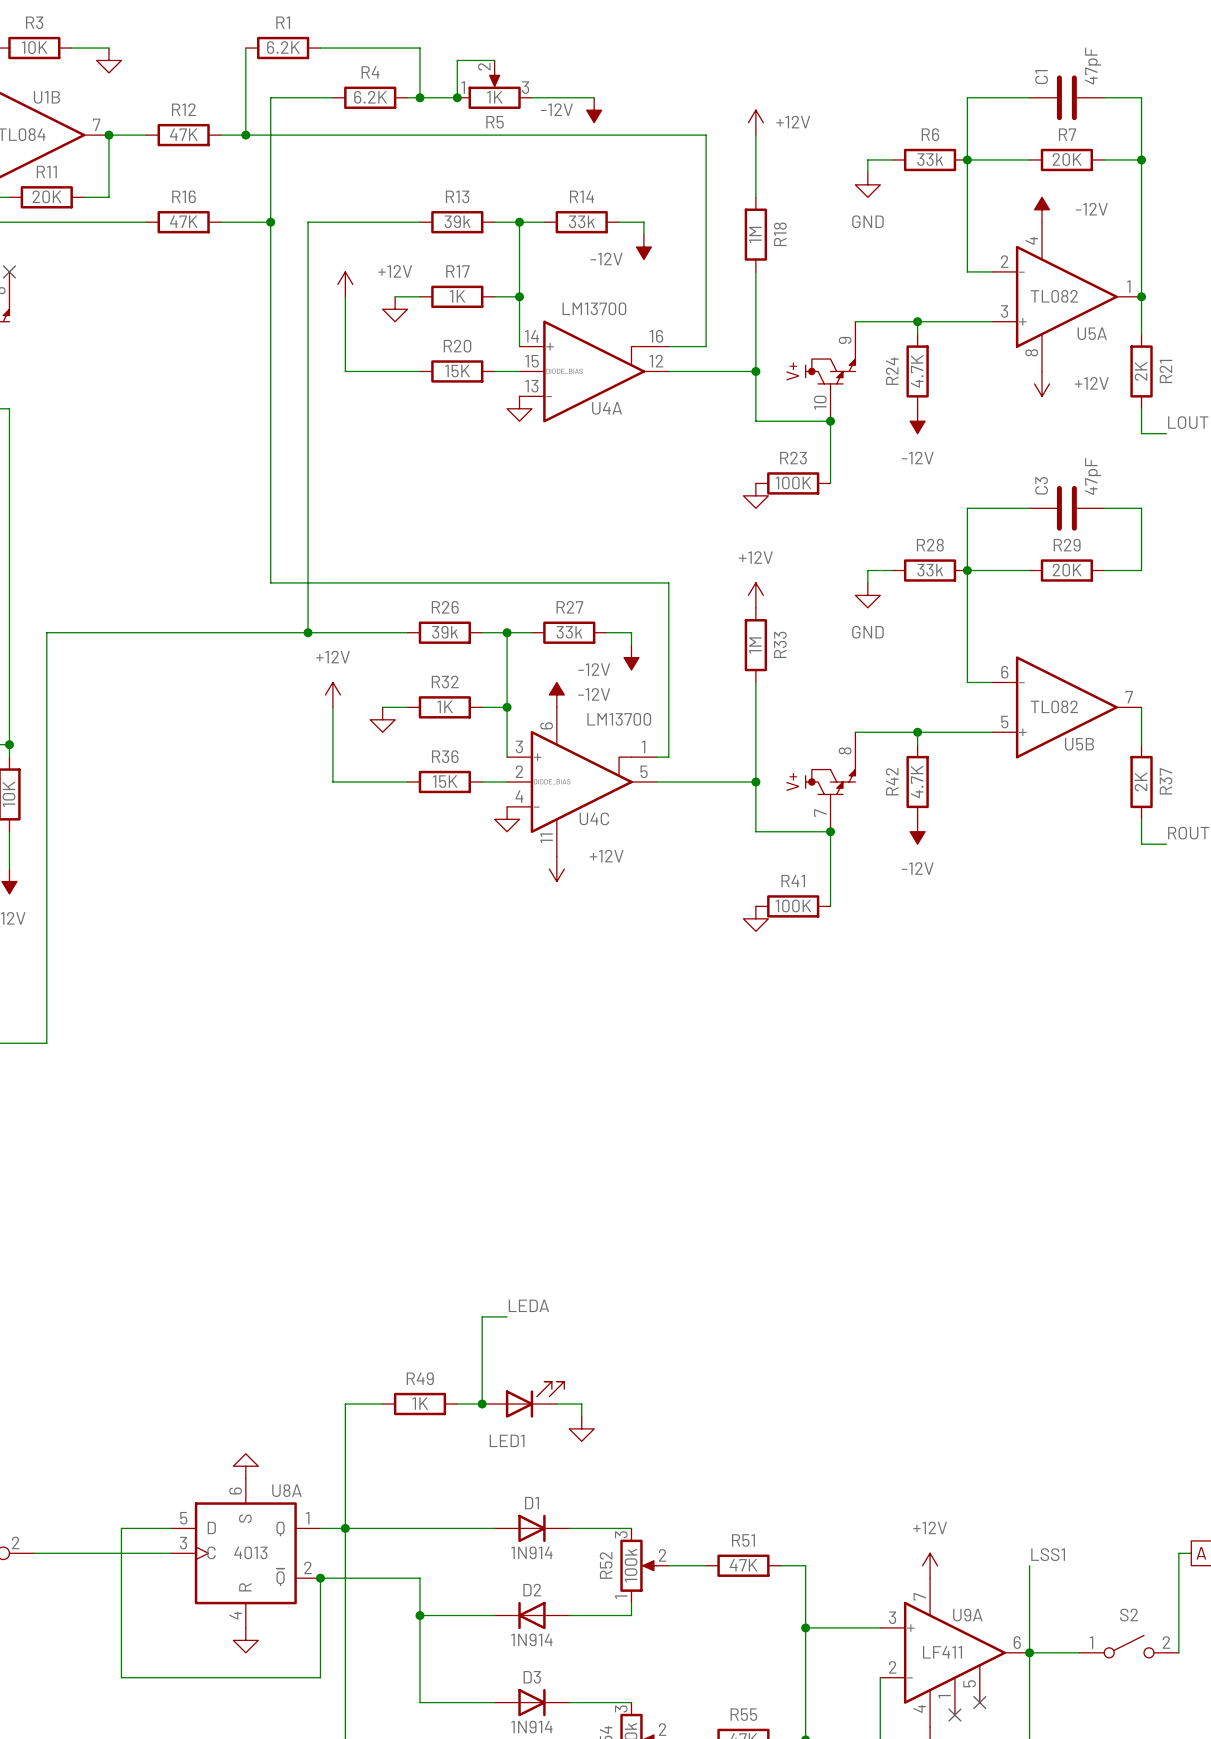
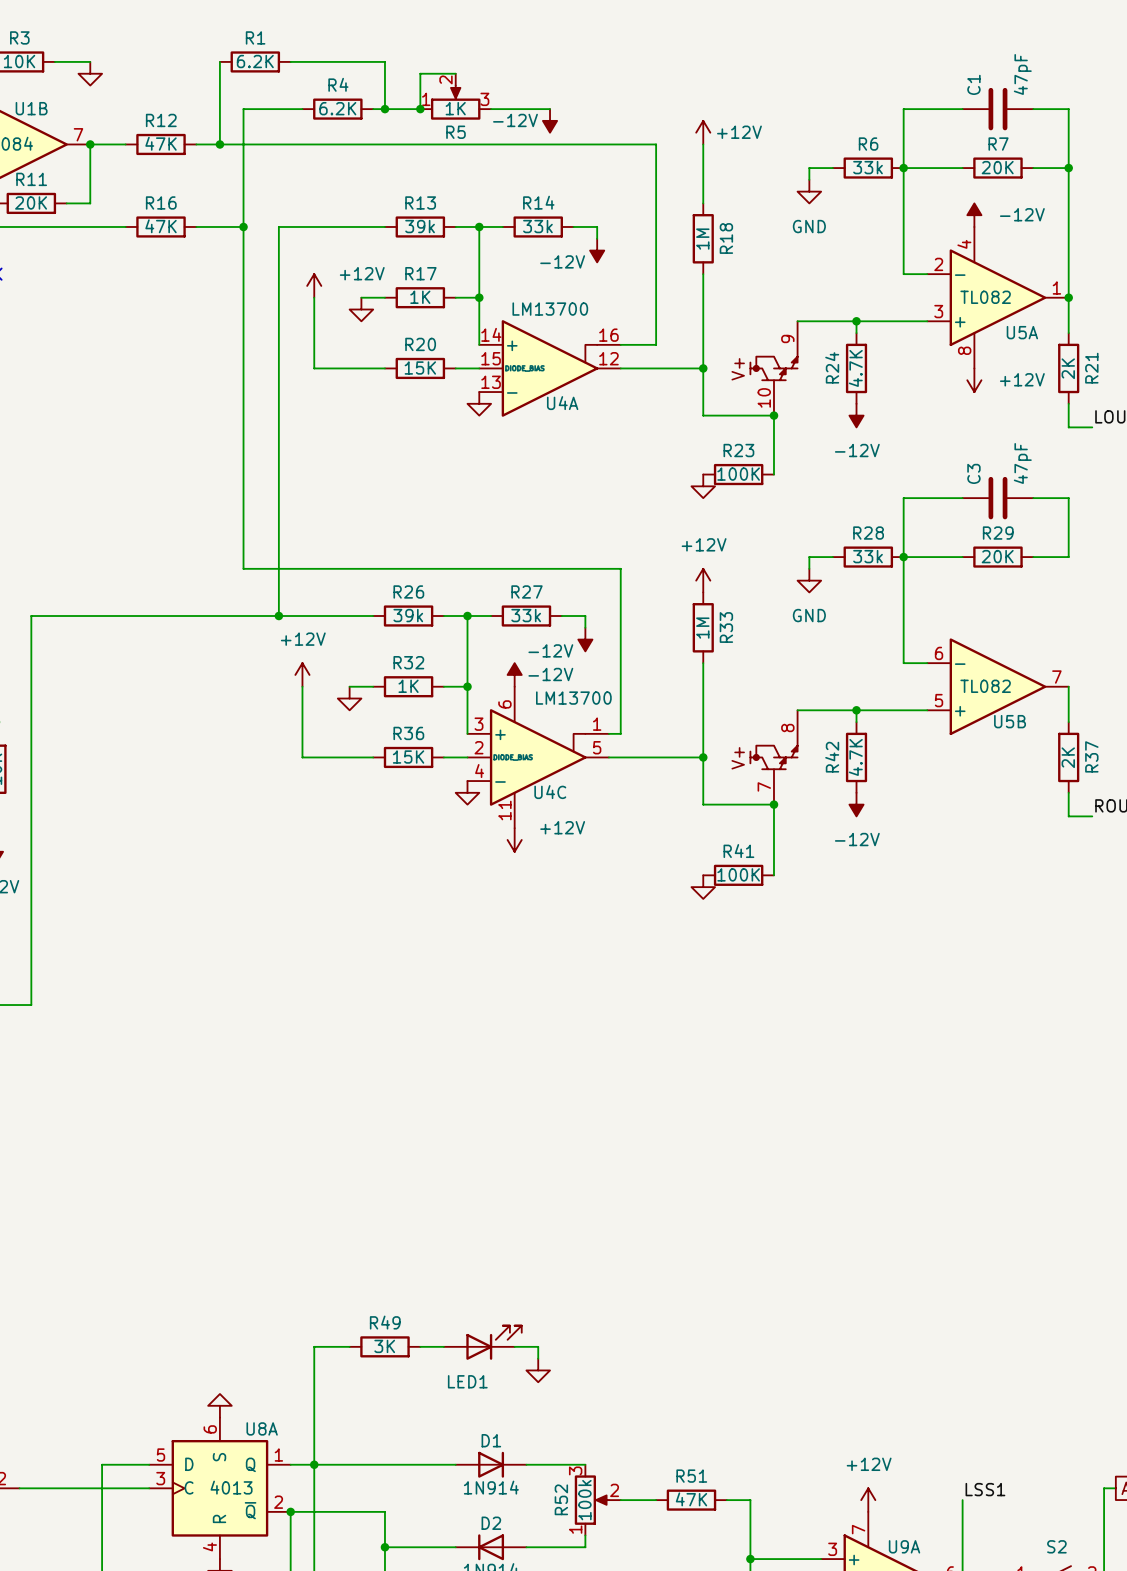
label: LEDA (528, 1305) -> none
wire: (507, 1316) (482, 1316) (482, 1404) -> none
R49 value: 1K (420, 1403) -> 3K (384, 1346)
junction: (482, 1404) -> none

